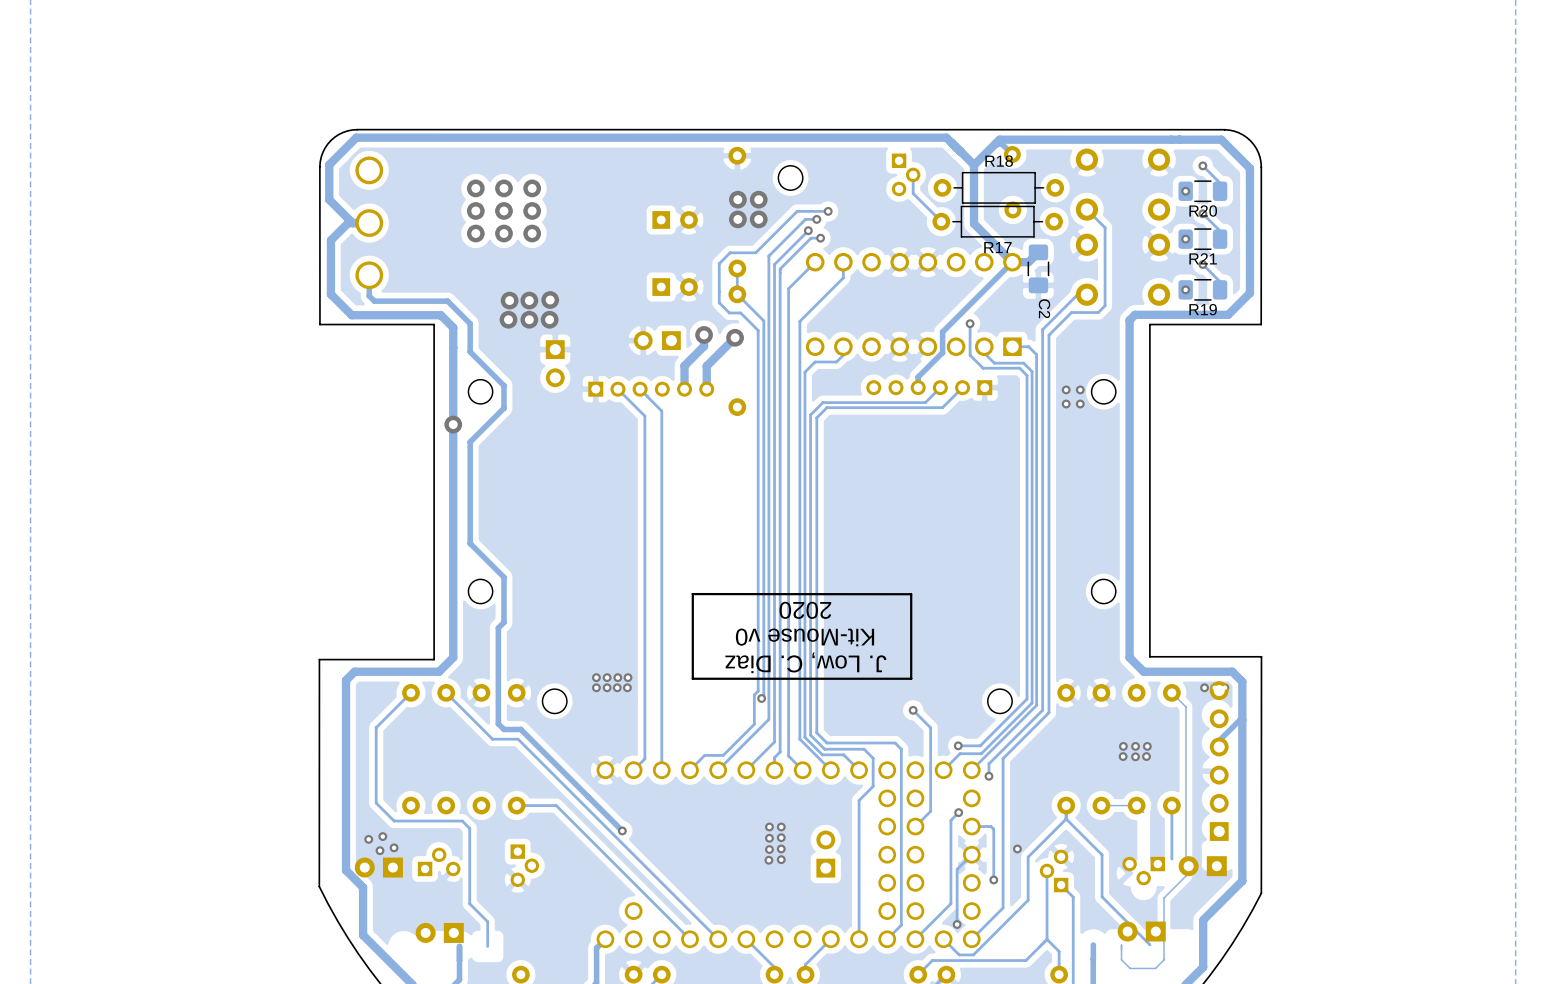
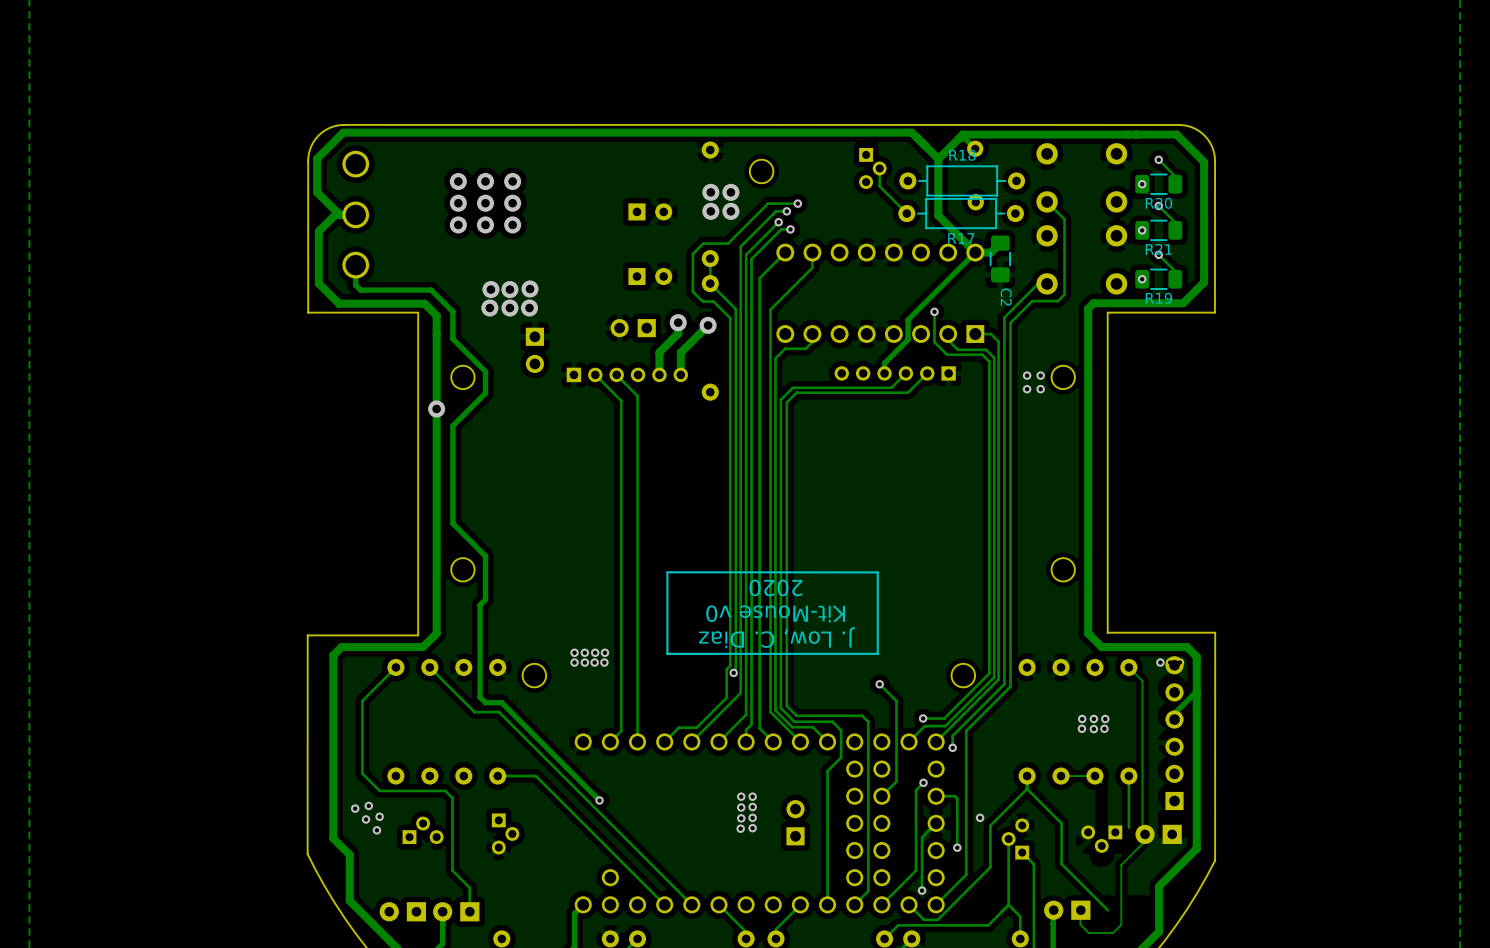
via: none -> (376, 830)
part: (378, 867) -> none
part position: (1141, 931) -> (1067, 910)
part: (439, 932) -> none
part: none -> (402, 911)
part: none -> (456, 911)

